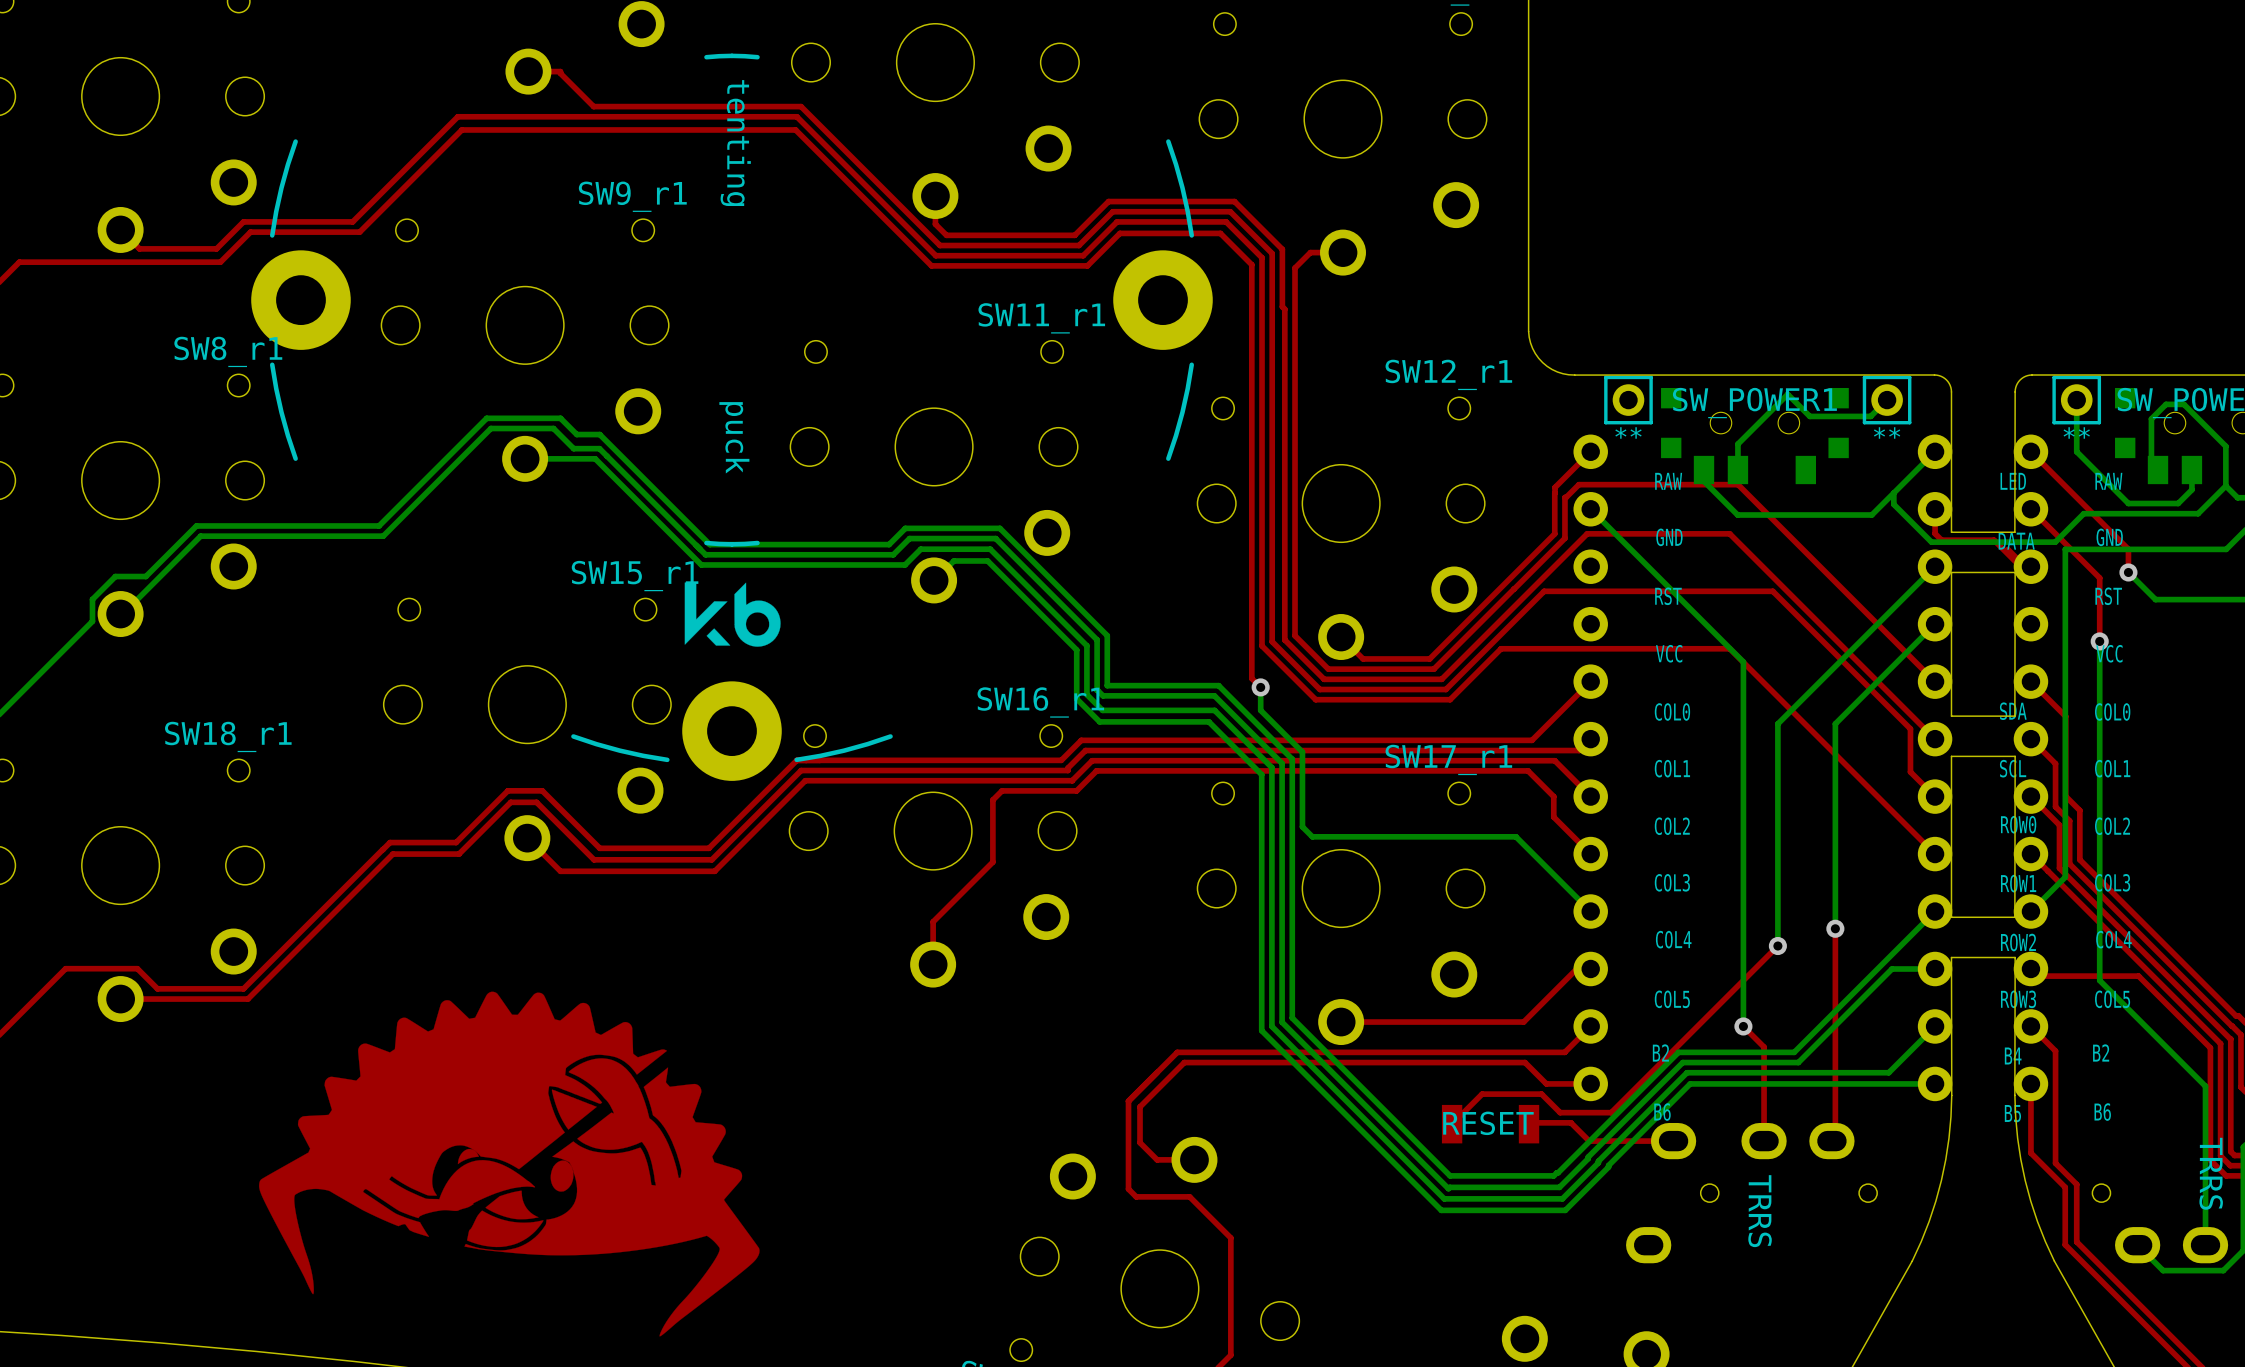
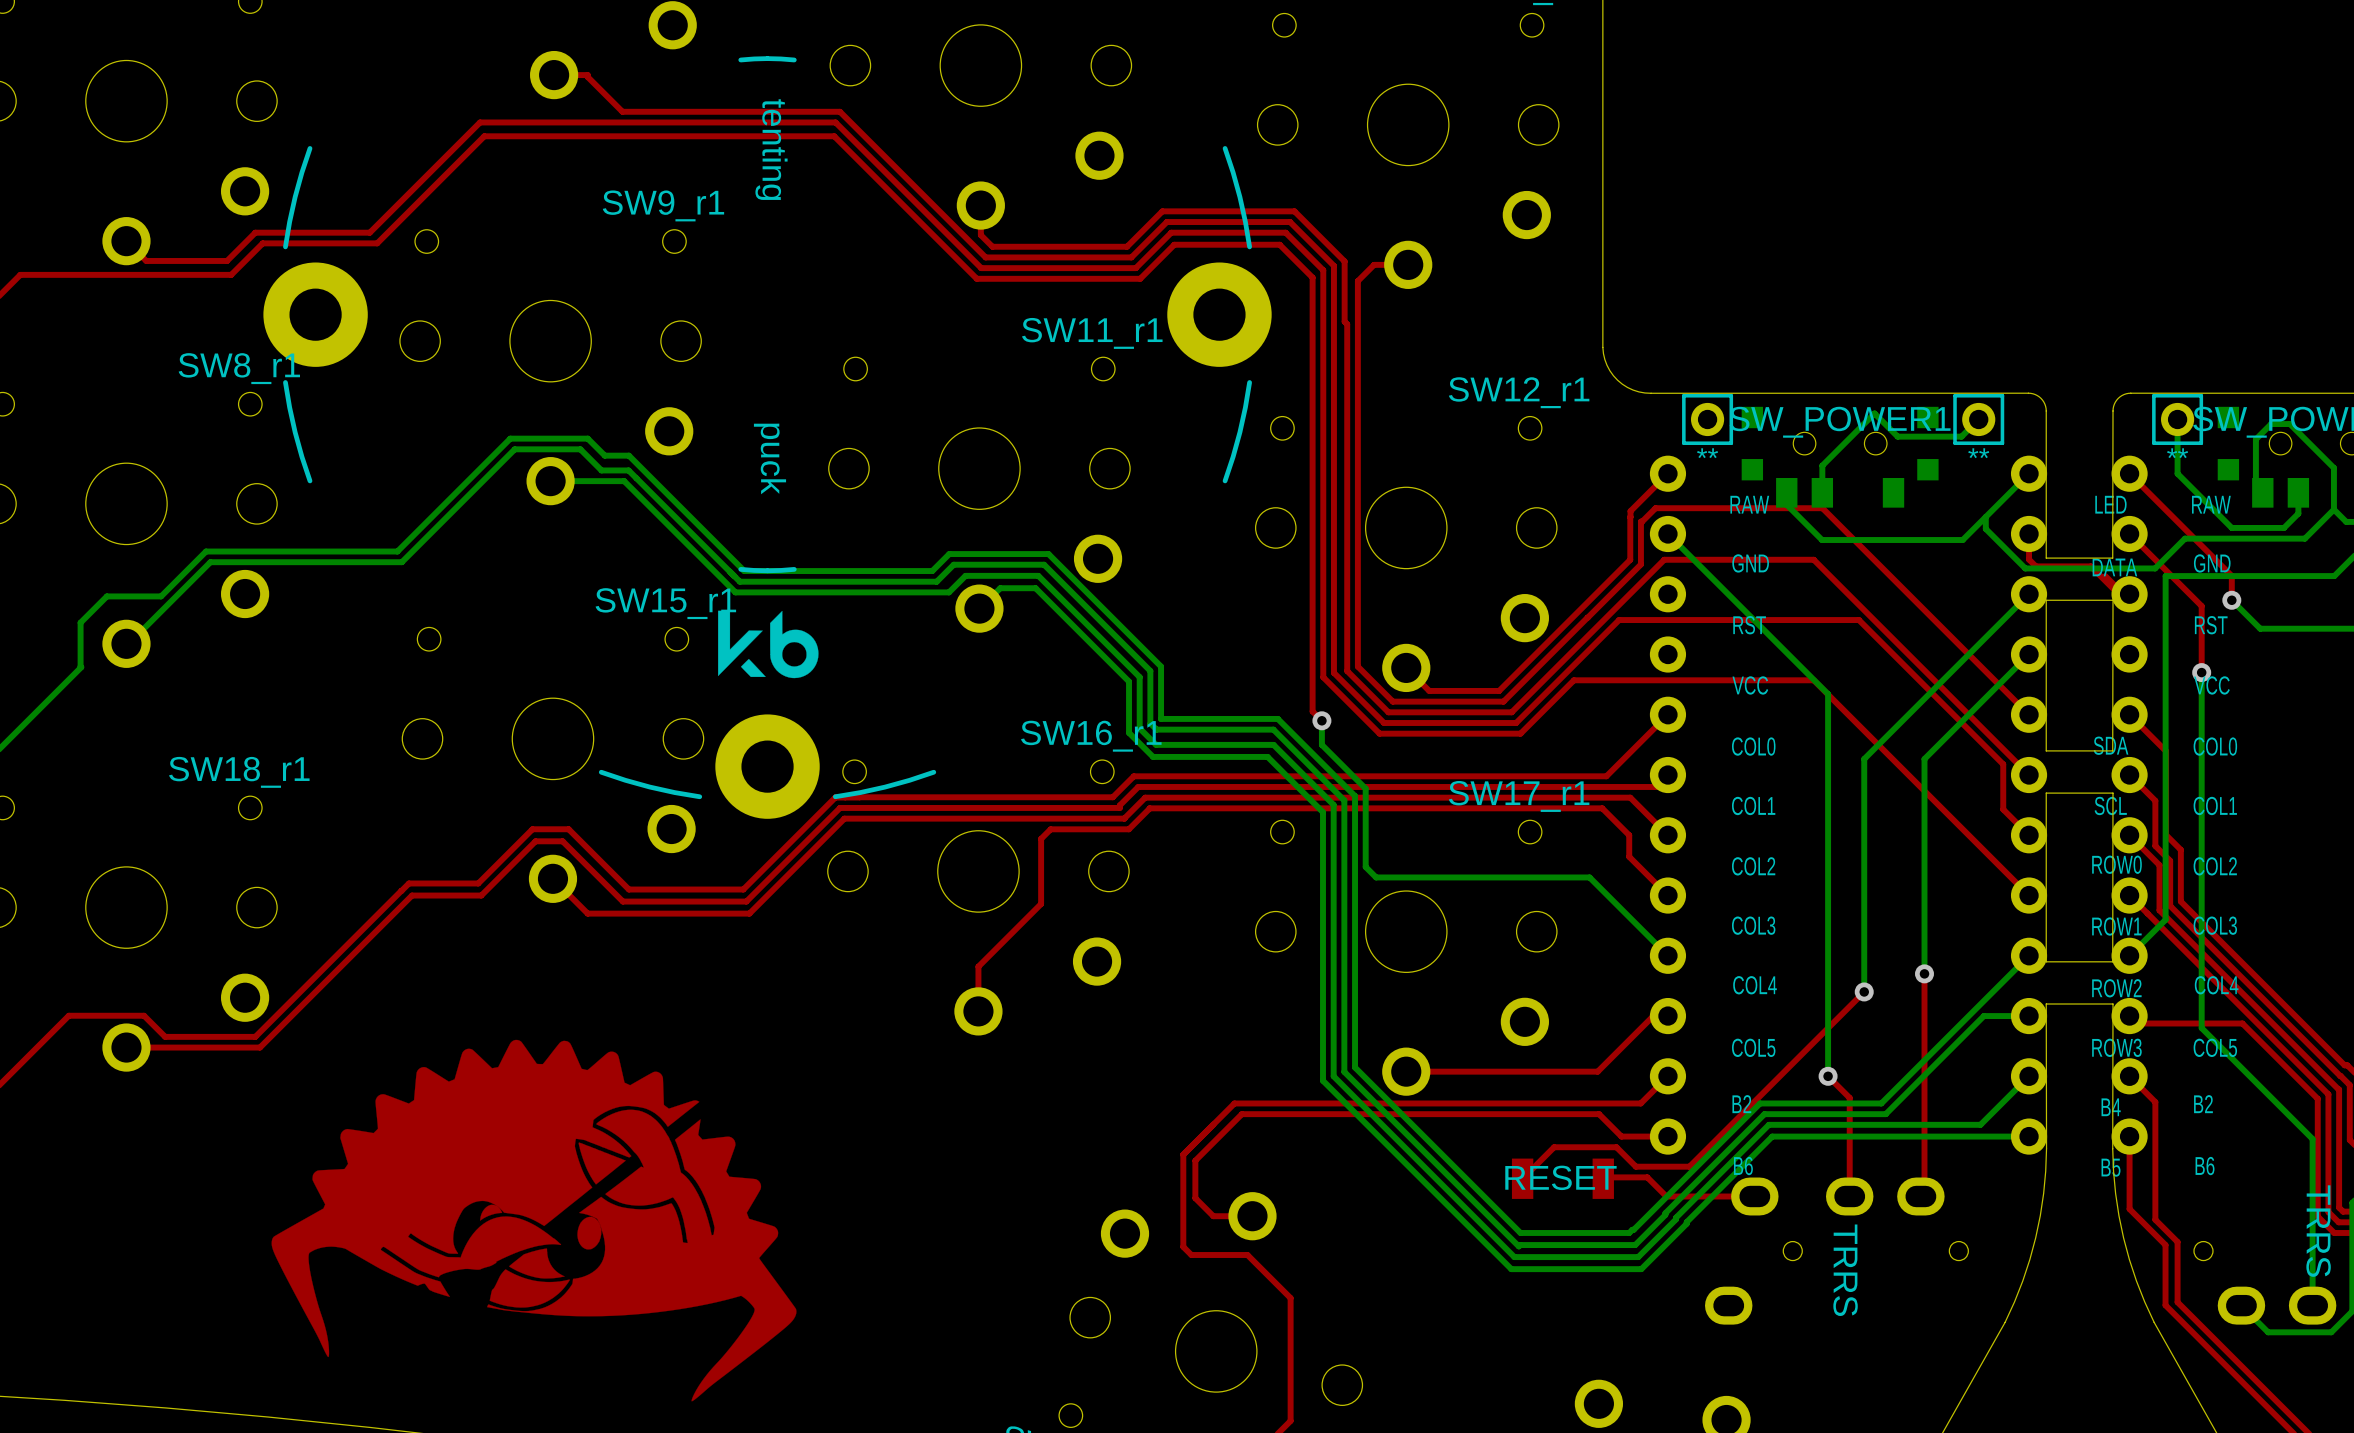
bottom track: (153, 568) (145, 576) (115, 576) (92, 599) (92, 621) (77, 636) -> (161, 596) (106, 596) (80, 622) (81, 667)

